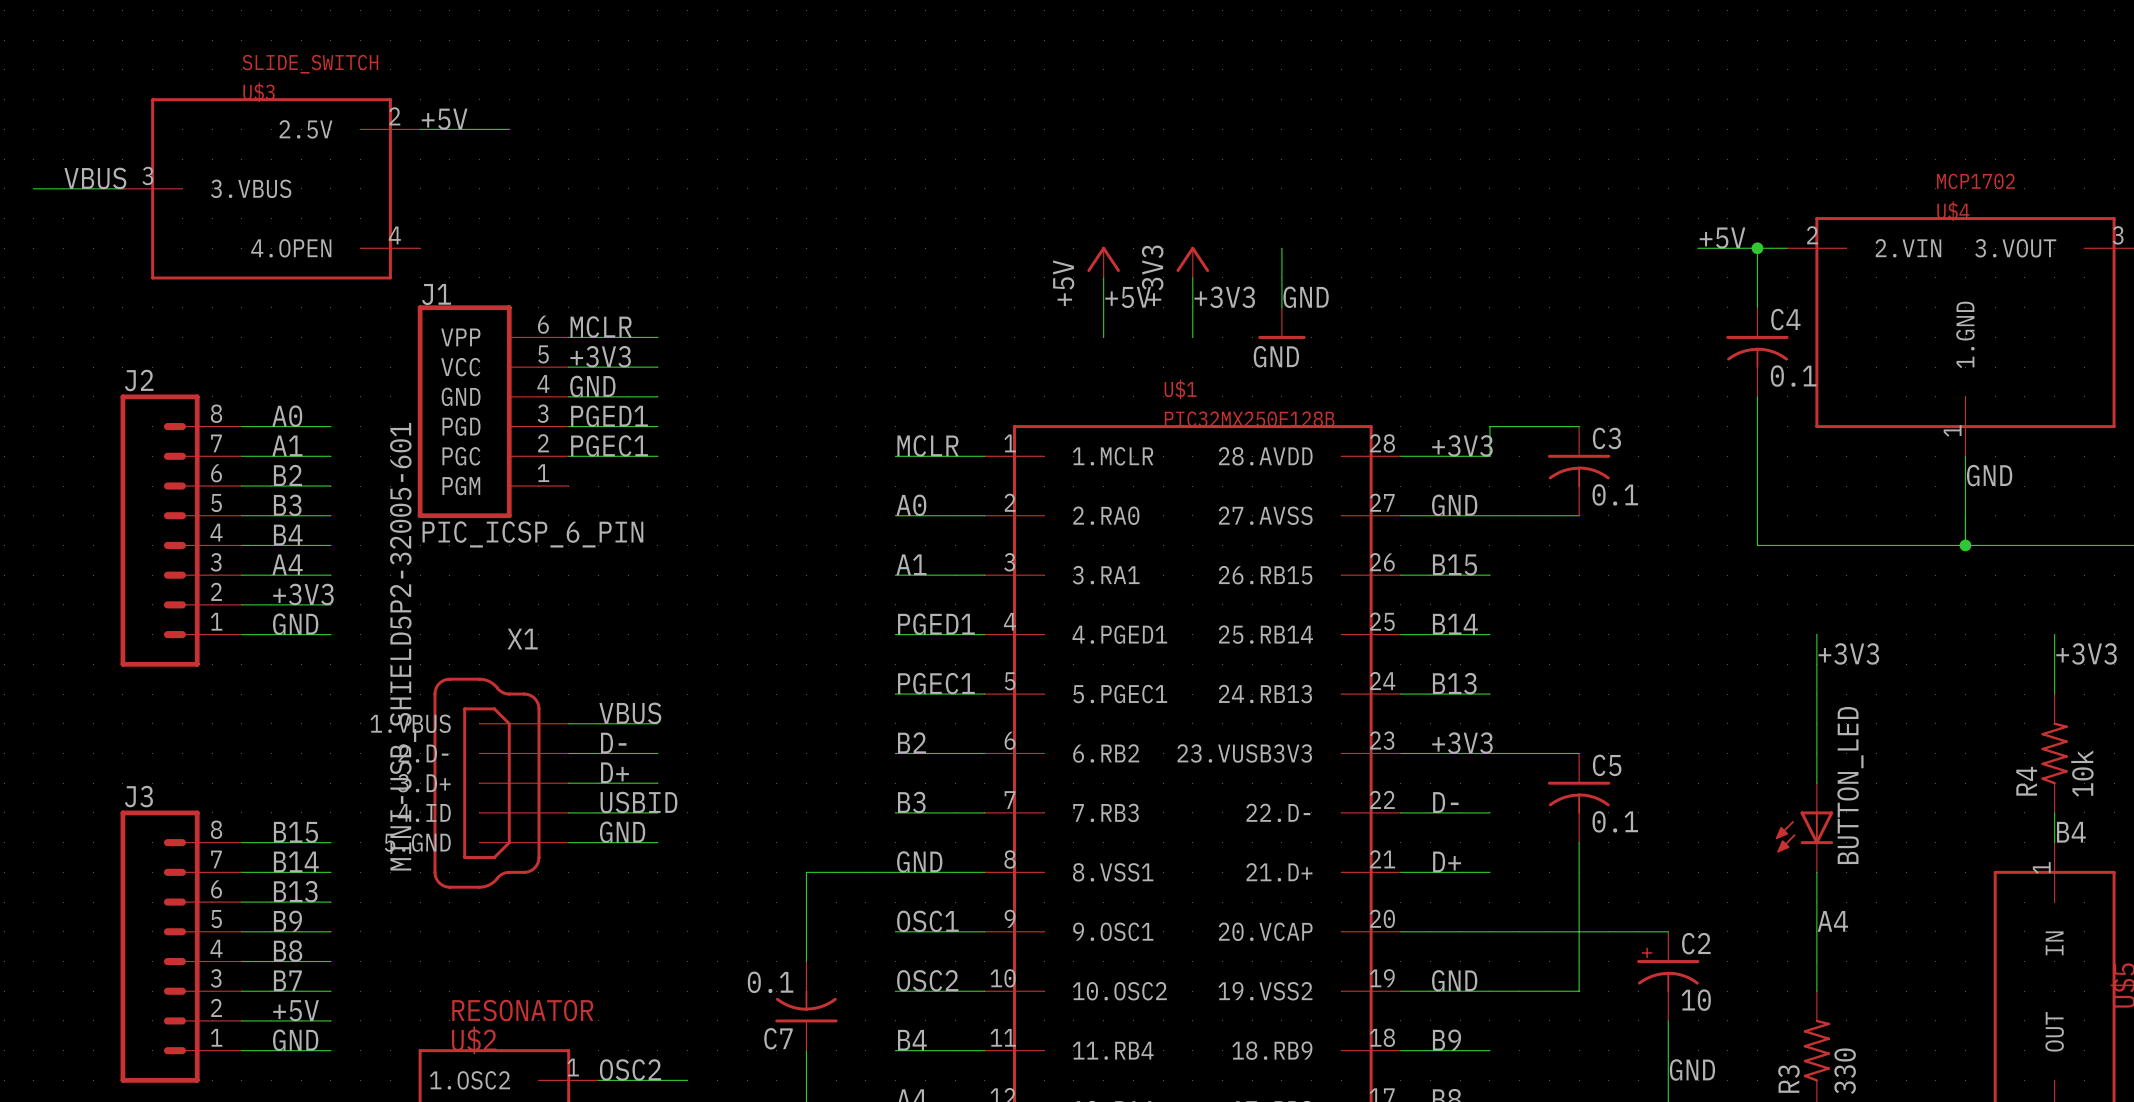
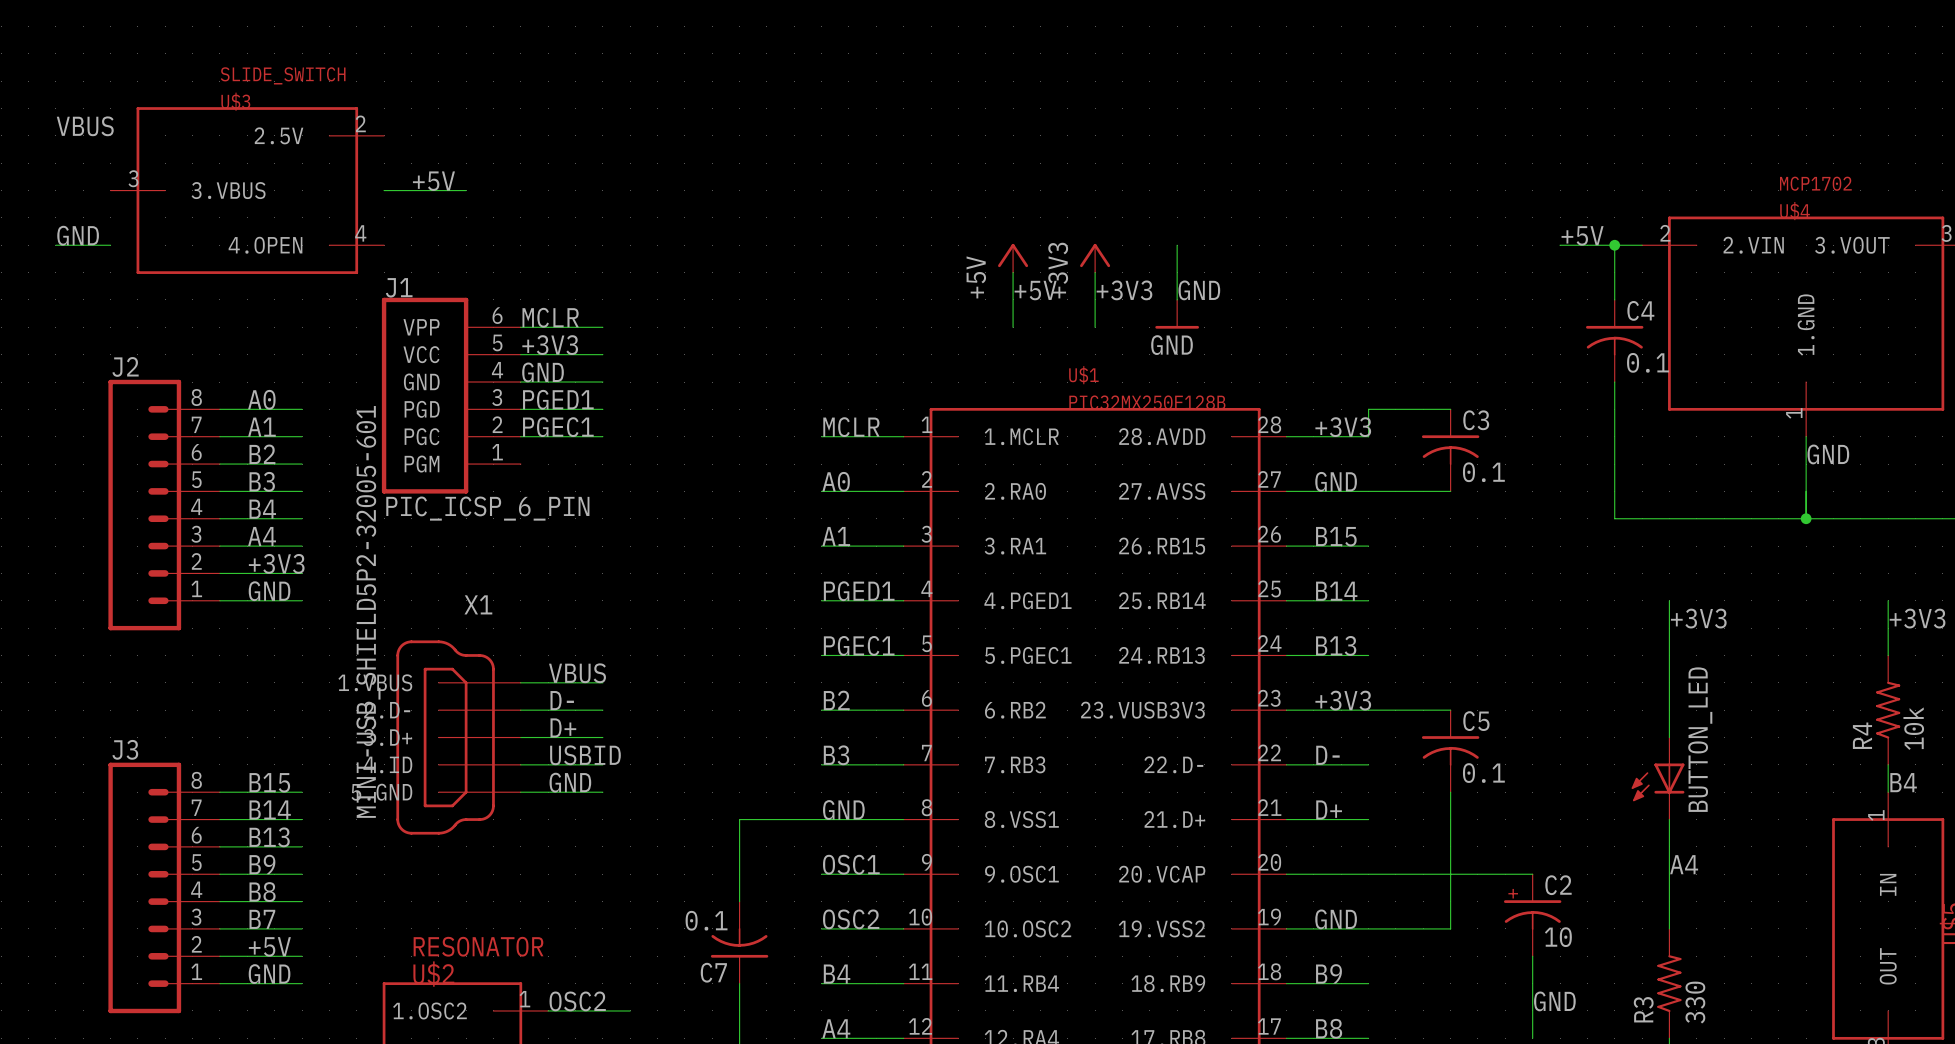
label position: +5V (444, 119) -> +5V (433, 181)
wire: (420, 129) (509, 129) -> (384, 190) (466, 190)
label position: VBUS (95, 178) -> VBUS (85, 126)
wire: (33, 188) (122, 188) -> none
label: none -> GND (78, 235)
wire: none -> (55, 245) (110, 245)

